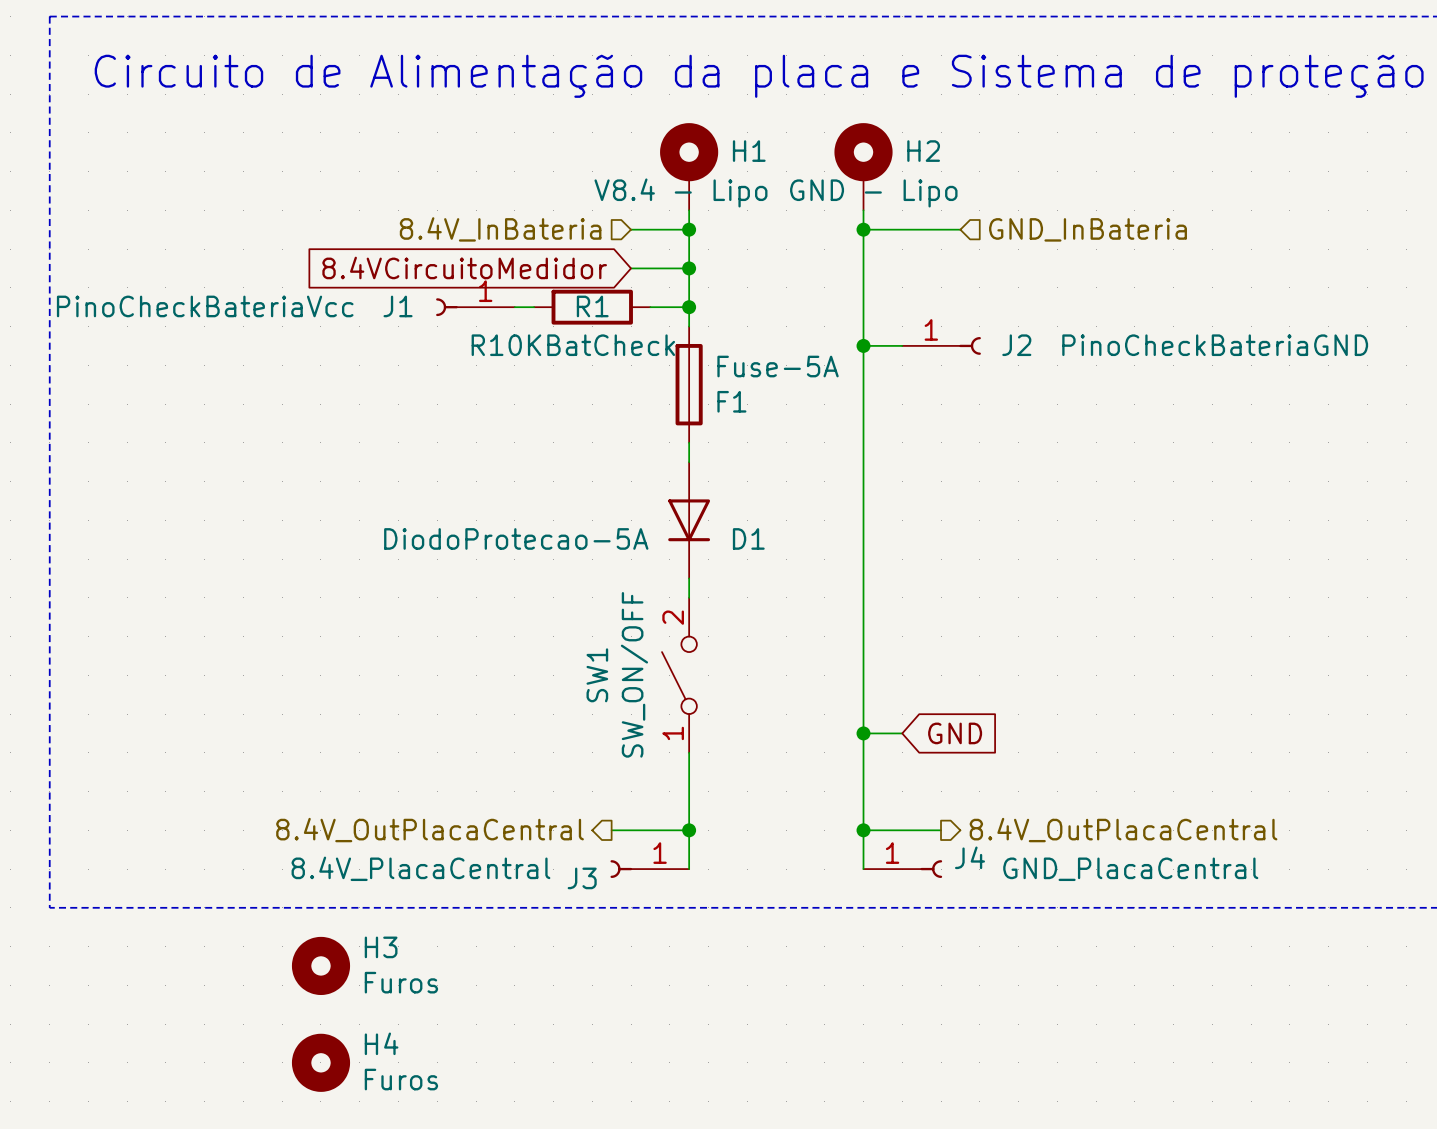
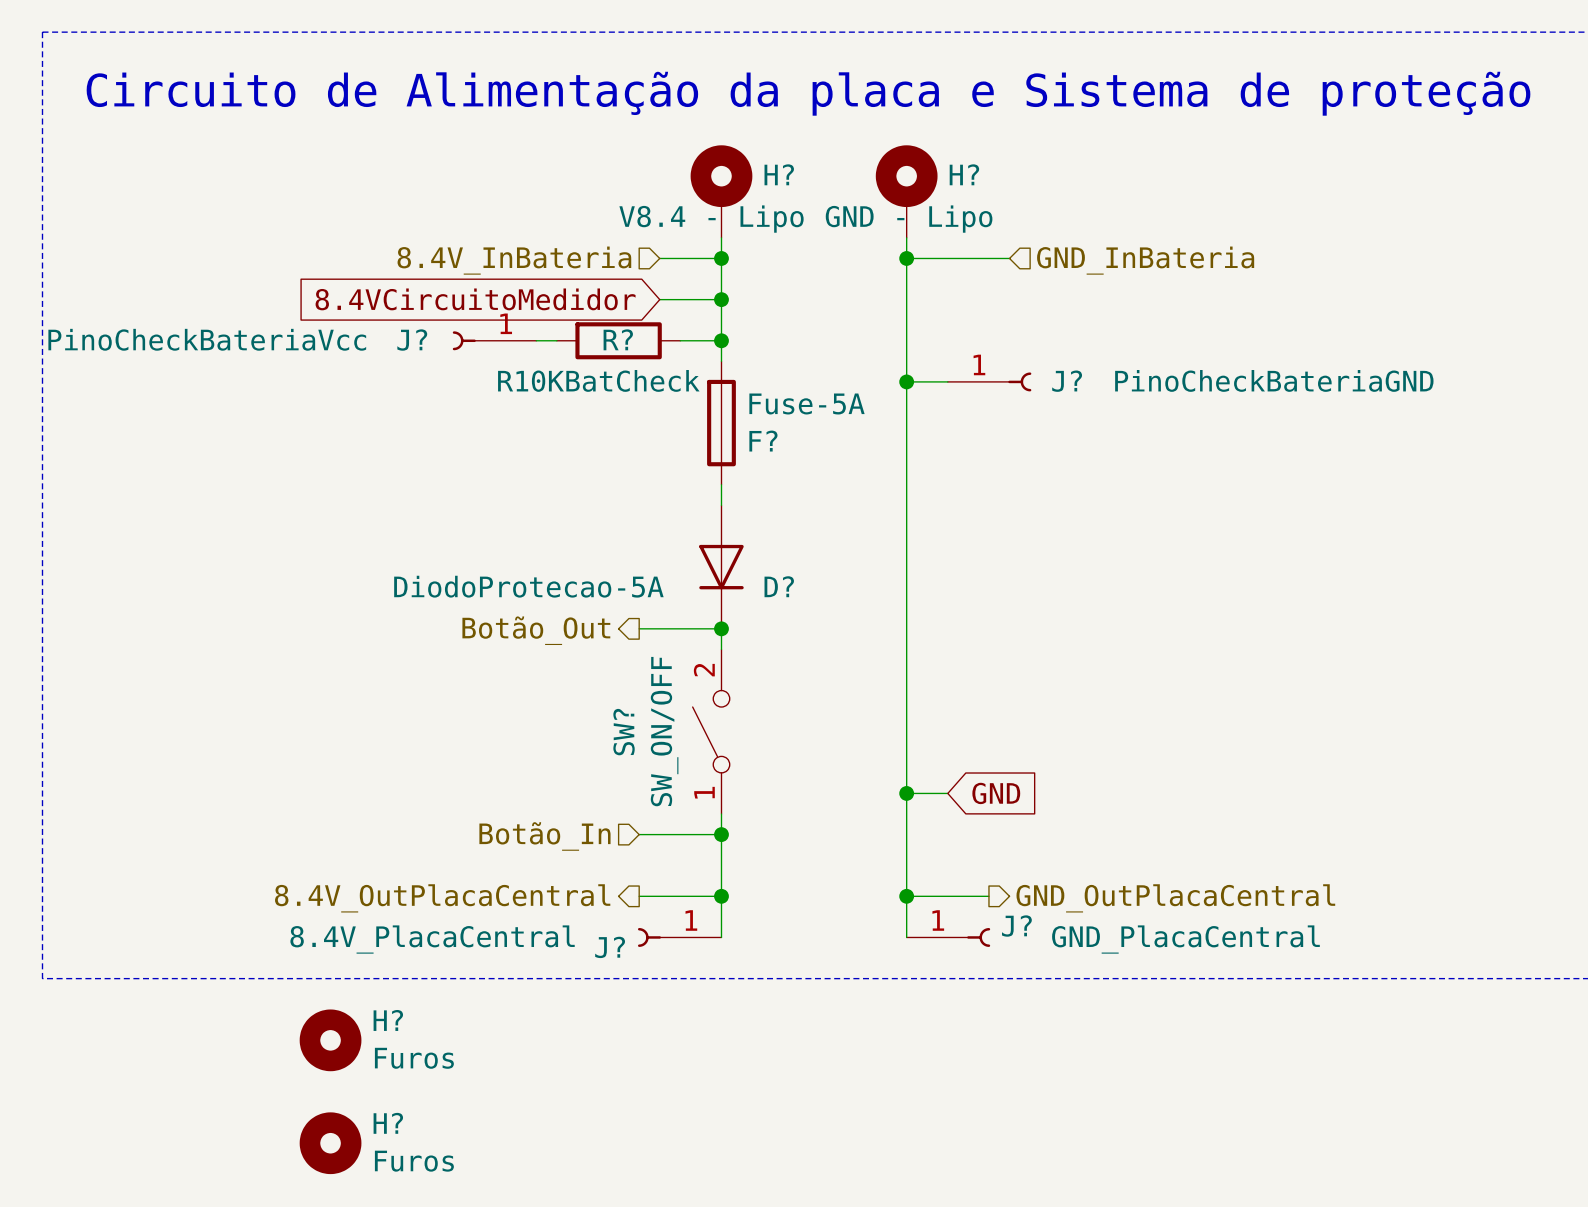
H1 name: H1 (749, 151) -> H? (779, 174)
H2 name: H2 (923, 151) -> H? (964, 174)
J1 name: J1 (398, 306) -> J? (412, 340)
R1 name: R1 (592, 306) -> R? (618, 339)
J2 name: J2 (1016, 345) -> J? (1067, 381)
F1 name: F1 (731, 401) -> F? (763, 441)
D1 name: D1 (748, 538) -> D? (779, 586)
hierarchical label: none -> Botão_Out (536, 630)
wire: none -> (639, 628) (721, 628)
junction: none -> (721, 628)
SW1 name: SW1 (597, 675) -> SW? (624, 732)
hierarchical label: none -> Botão_In (544, 836)
wire: none -> (639, 834) (721, 834)
junction: none -> (721, 834)
hierarchical label: 8.4V_OutPlacaCentral (1123, 830) -> GND_OutPlacaCentral (1175, 898)
J4 name: J4 (969, 857) -> J? (1016, 926)
J3 name: J3 (582, 878) -> J? (610, 947)
H3 name: H3 (381, 947) -> H? (388, 1020)
H4 name: H4 (381, 1043) -> H? (388, 1123)

